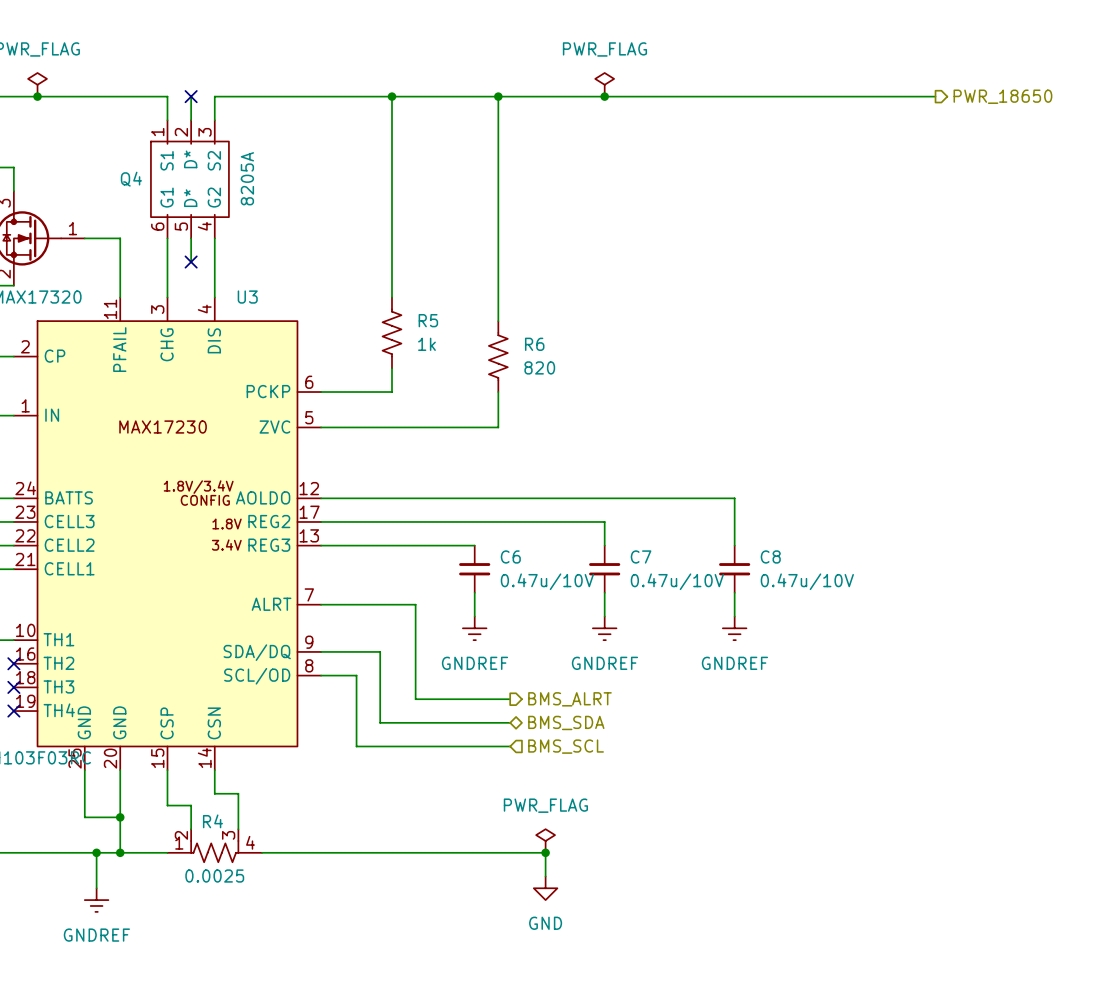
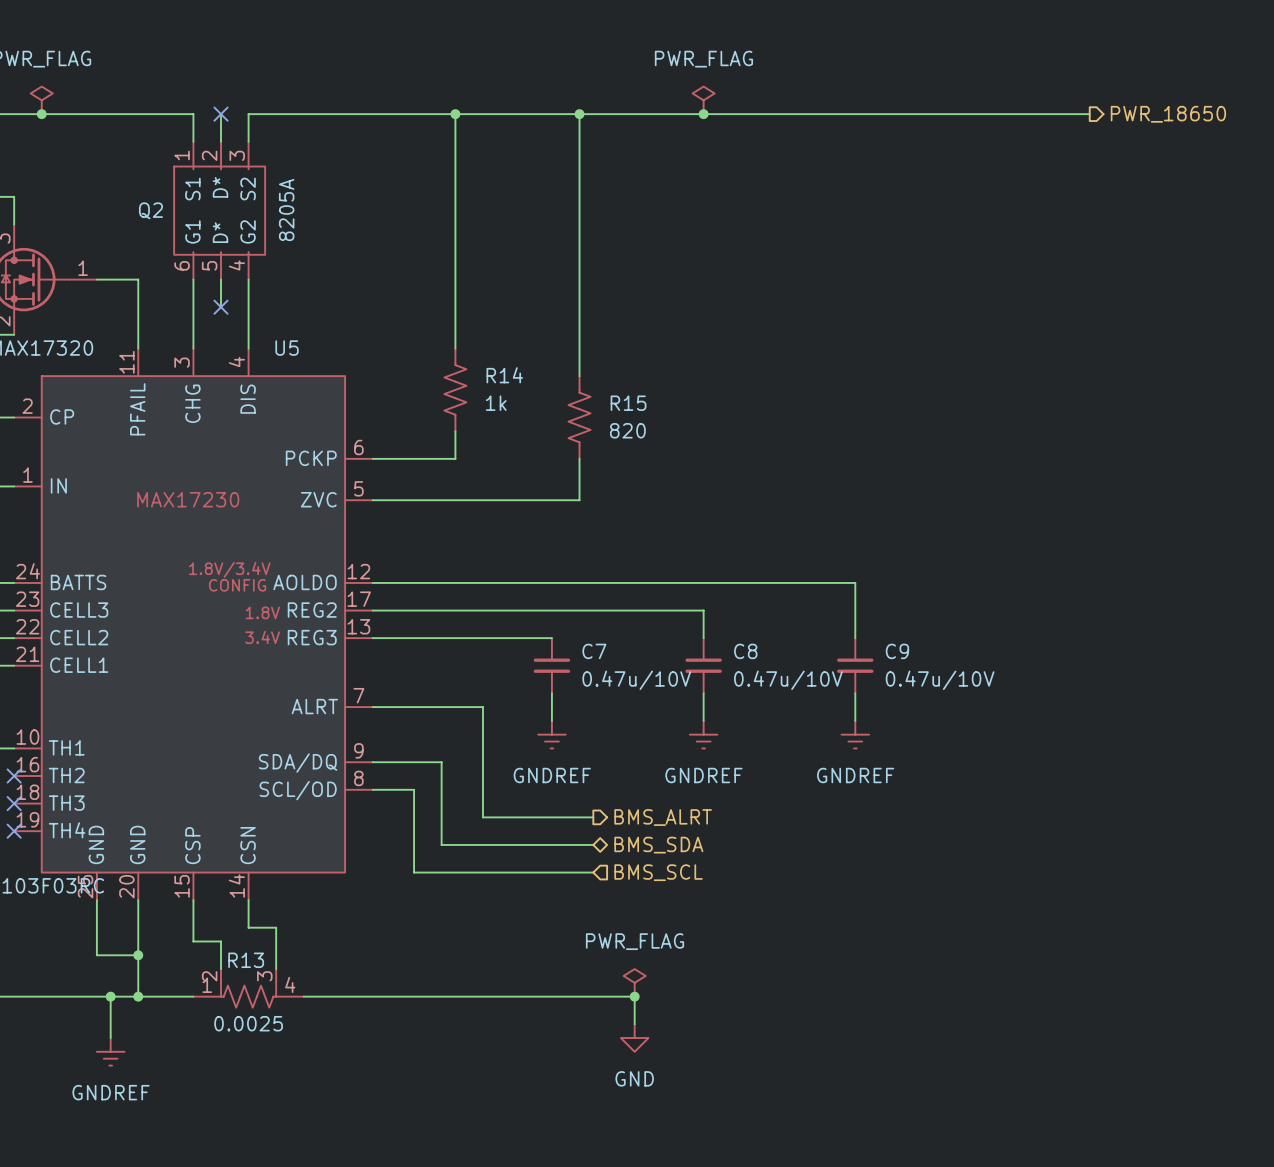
Q4 name: Q4 (131, 179) -> Q2 (150, 210)
U3 name: U3 (247, 297) -> U5 (287, 348)
R5 name: R5 (428, 320) -> R14 (504, 375)
R6 name: R6 (534, 344) -> R15 (628, 403)
C6 name: C6 (510, 556) -> C7 (594, 651)
C7 name: C7 (641, 556) -> C8 (745, 651)
C8 name: C8 (770, 556) -> C9 (897, 651)
R4 name: R4 (212, 821) -> R13 (246, 960)

